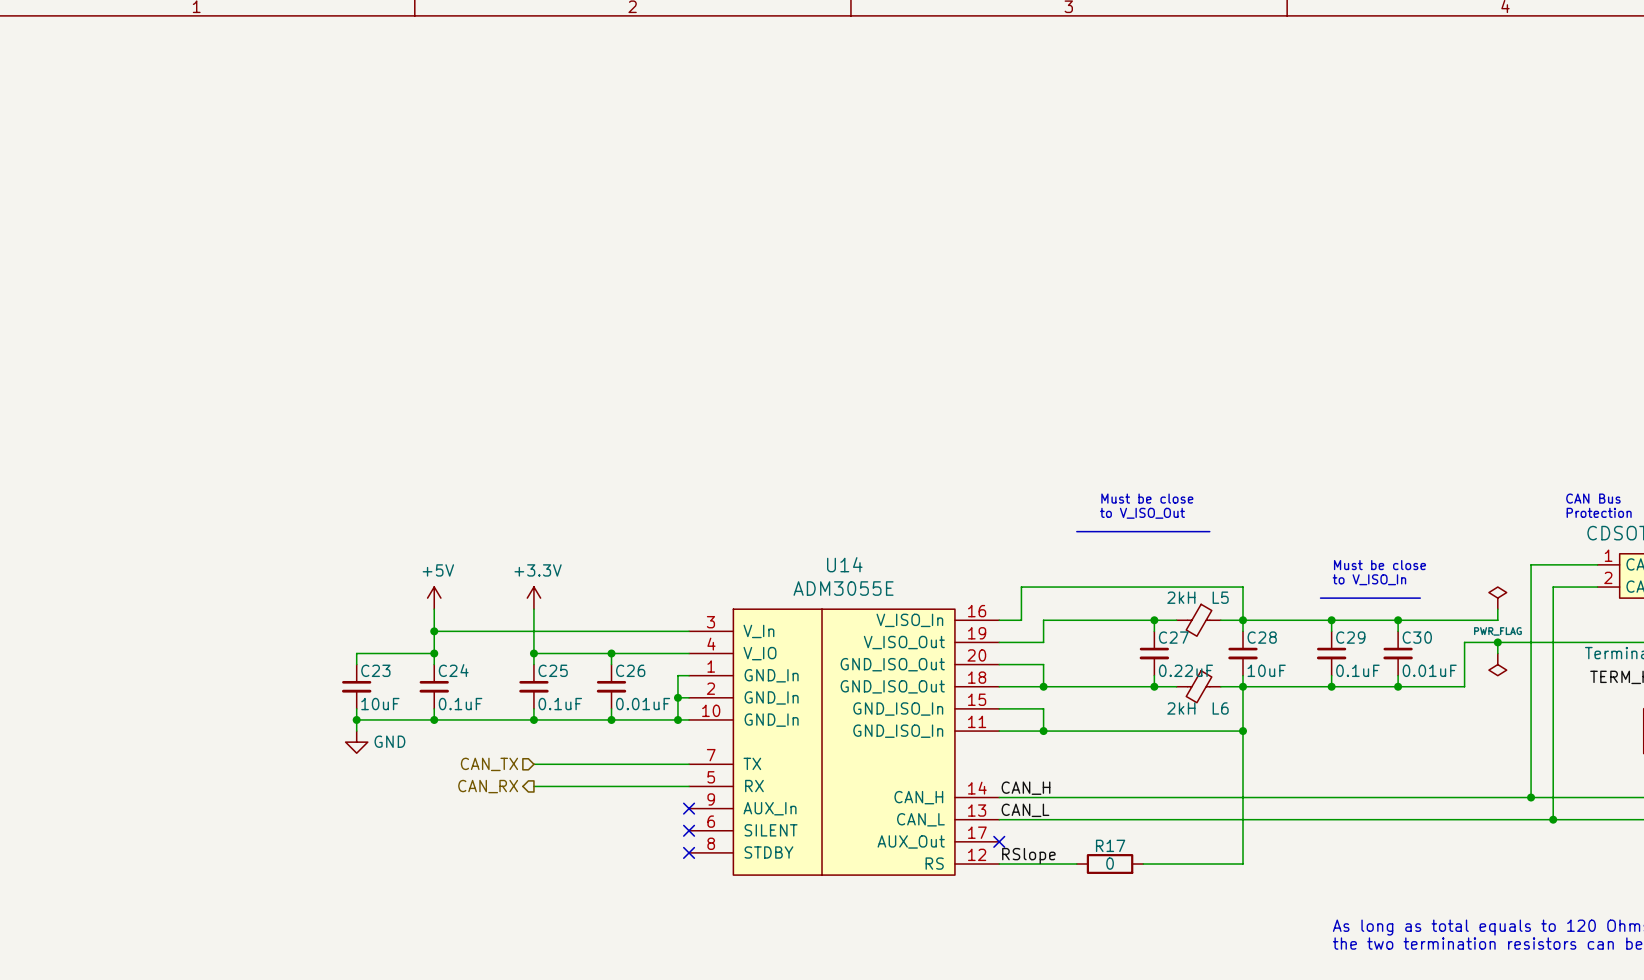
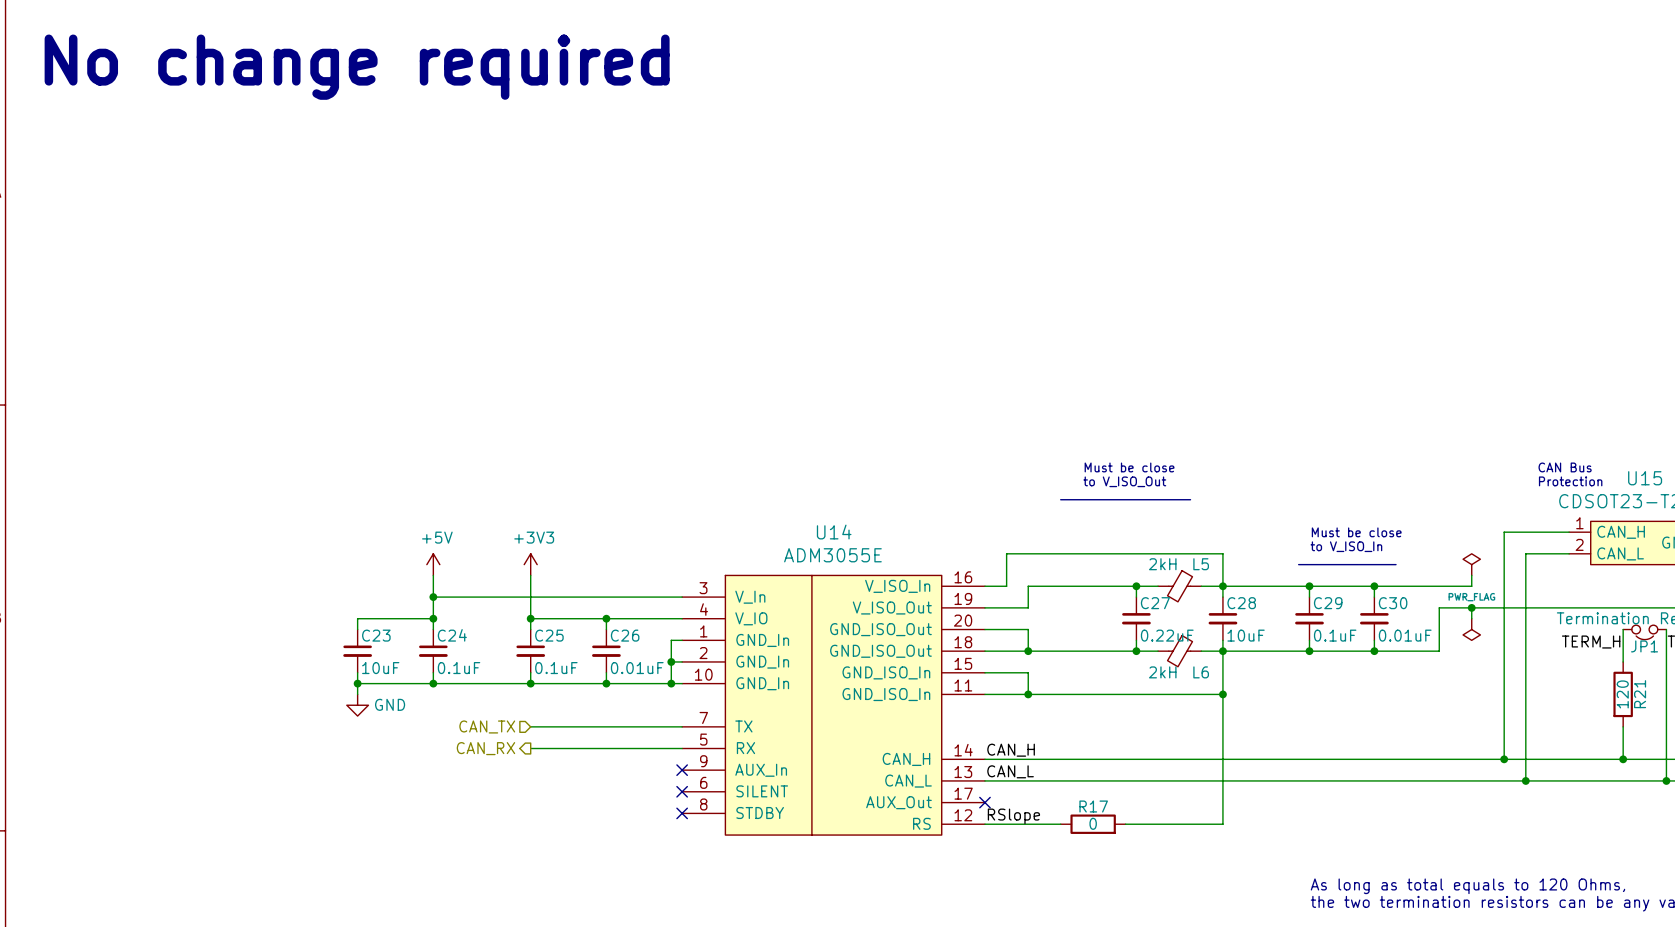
text: none -> No change required (357, 67)
power symbol: +3.3V (533, 598) -> +3V3 (530, 564)

